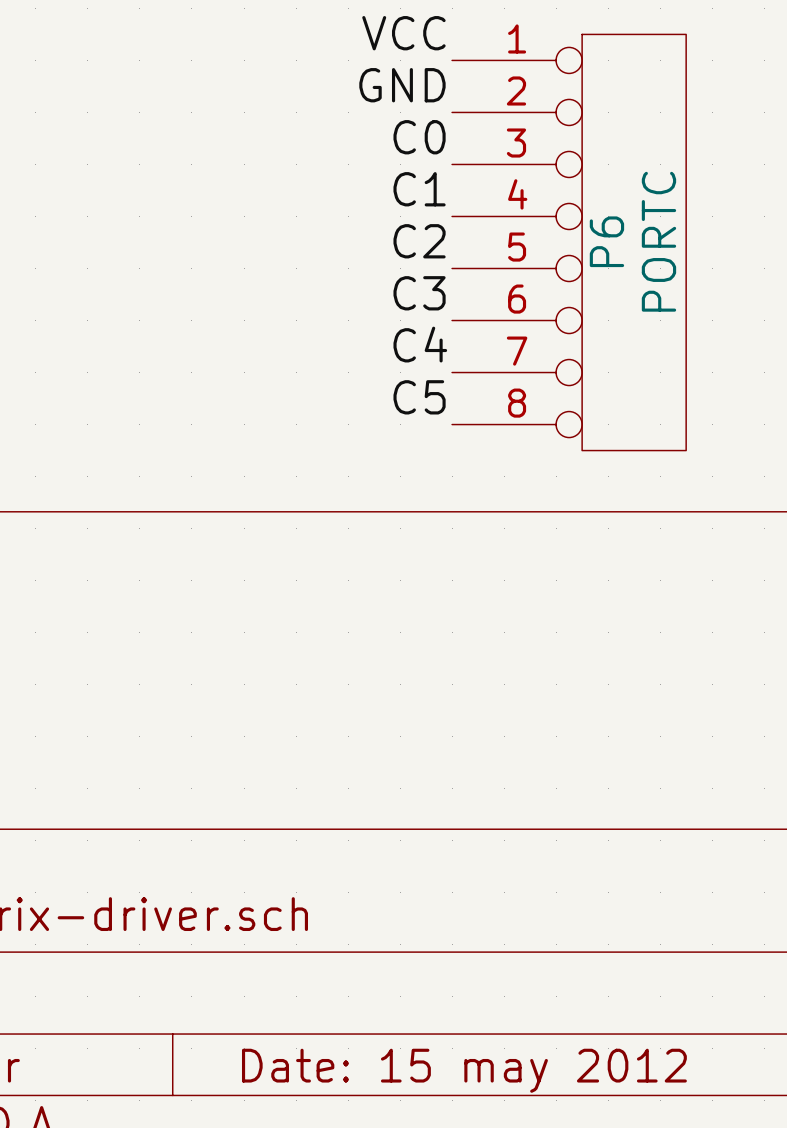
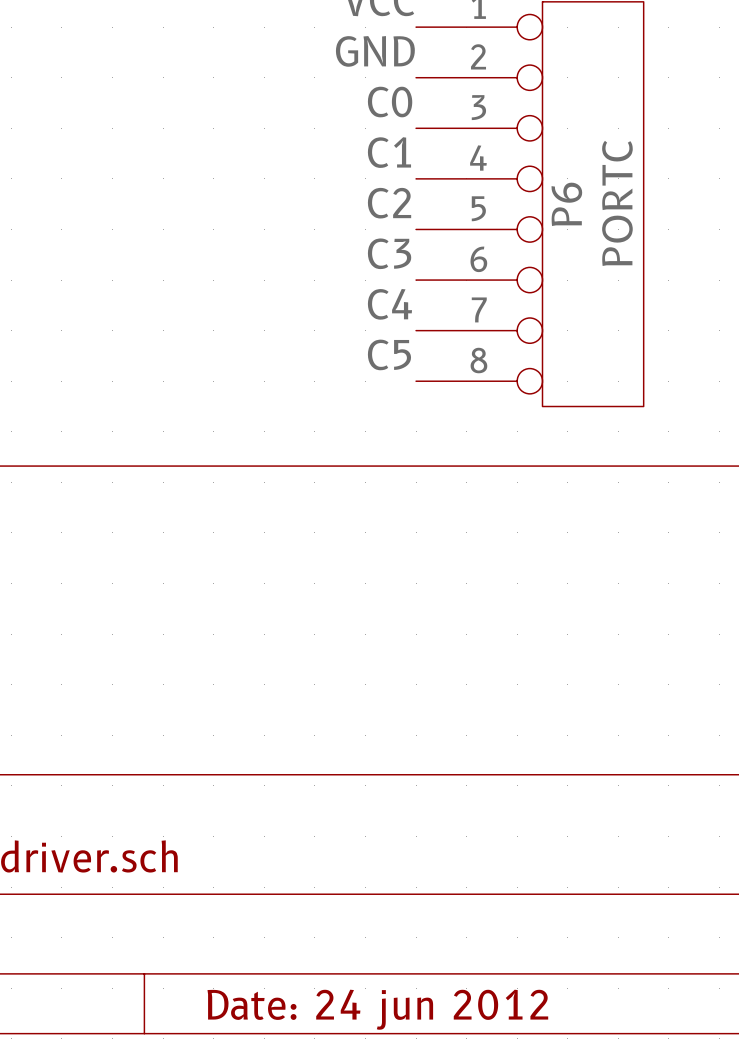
title block: Date: 15 may 2012 (464, 1070) -> Date: 24 jun 2012 (377, 1009)

